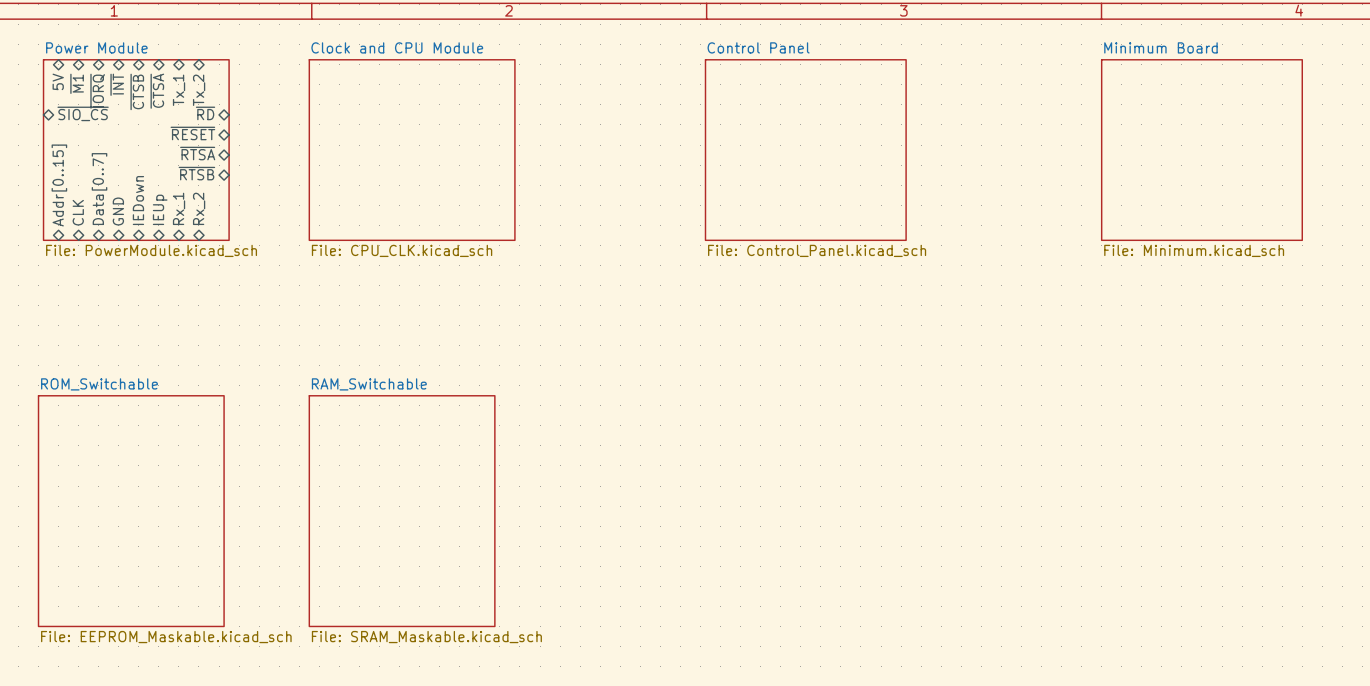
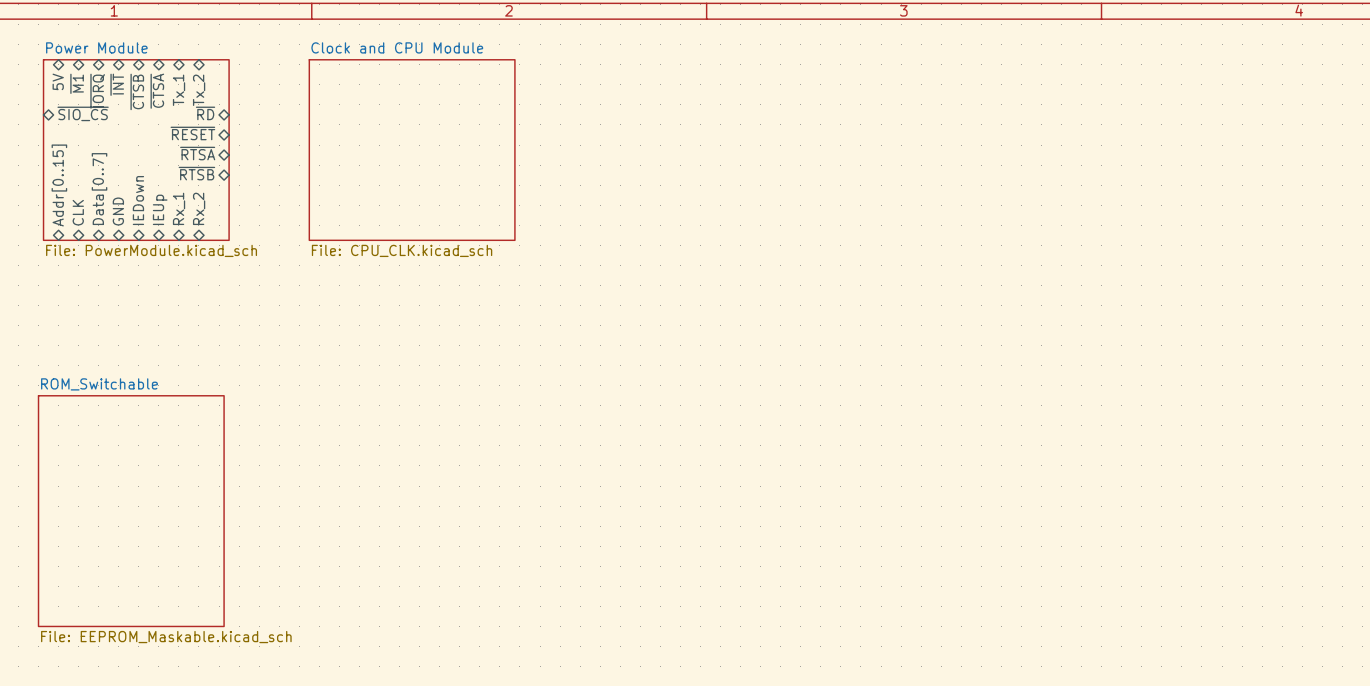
sheet Control Panel: File: Control_Panel.kicad_sch (805, 150) -> none
sheet Minimum Board: File: Minimum.kicad_sch (1201, 150) -> none
sheet RAM_Switchable: File: SRAM_Maskable.kicad_sch (402, 511) -> none

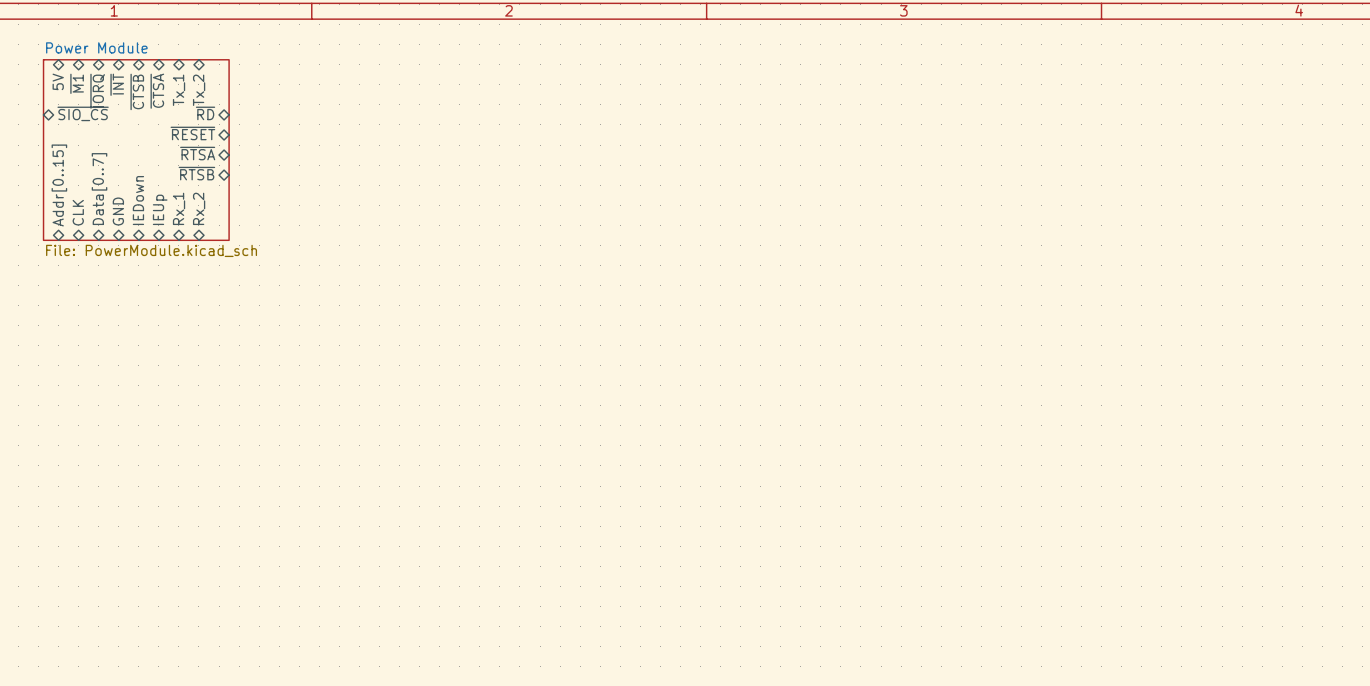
sheet Clock and CPU Module: File: CPU_CLK.kicad_sch (412, 150) -> none
sheet ROM_Switchable: File: EEPROM_Maskable.kicad_sch (131, 511) -> none

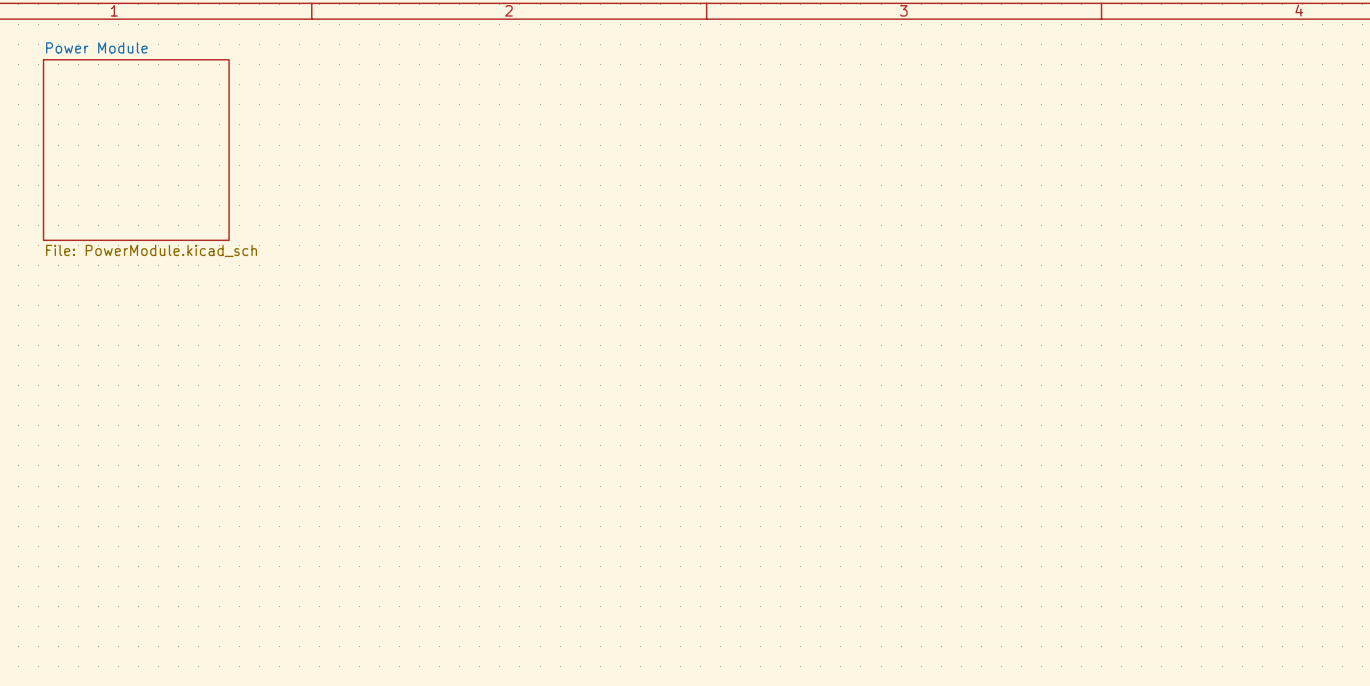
sheet pin: 5V (58, 81) -> none
sheet pin: ~{M1} (77, 83) -> none
sheet pin: ~{INT} (117, 84) -> none
sheet pin: Tx_1 (179, 90) -> none
sheet pin: Tx_2 (199, 90) -> none
sheet pin: ~{IORQ} (97, 91) -> none
sheet pin: ~{CTSB} (137, 91) -> none
sheet pin: ~{CTSA} (157, 91) -> none
sheet pin: ~{SIO_CS} (83, 113) -> none
sheet pin: ~{RD} (205, 113) -> none
sheet pin: ~{RESET} (192, 133) -> none
sheet pin: ~{RTSA} (197, 153) -> none
sheet pin: ~{RTSB} (196, 173) -> none
sheet pin: Addr[0..15] (59, 185) -> none
sheet pin: Data[0..7] (99, 189) -> none
sheet pin: IEDown (138, 200) -> none
sheet pin: Rx_1 (179, 208) -> none
sheet pin: Rx_2 (199, 208) -> none
sheet pin: IEUp (160, 209) -> none
sheet pin: GND (118, 211) -> none
sheet pin: CLK (78, 212) -> none

